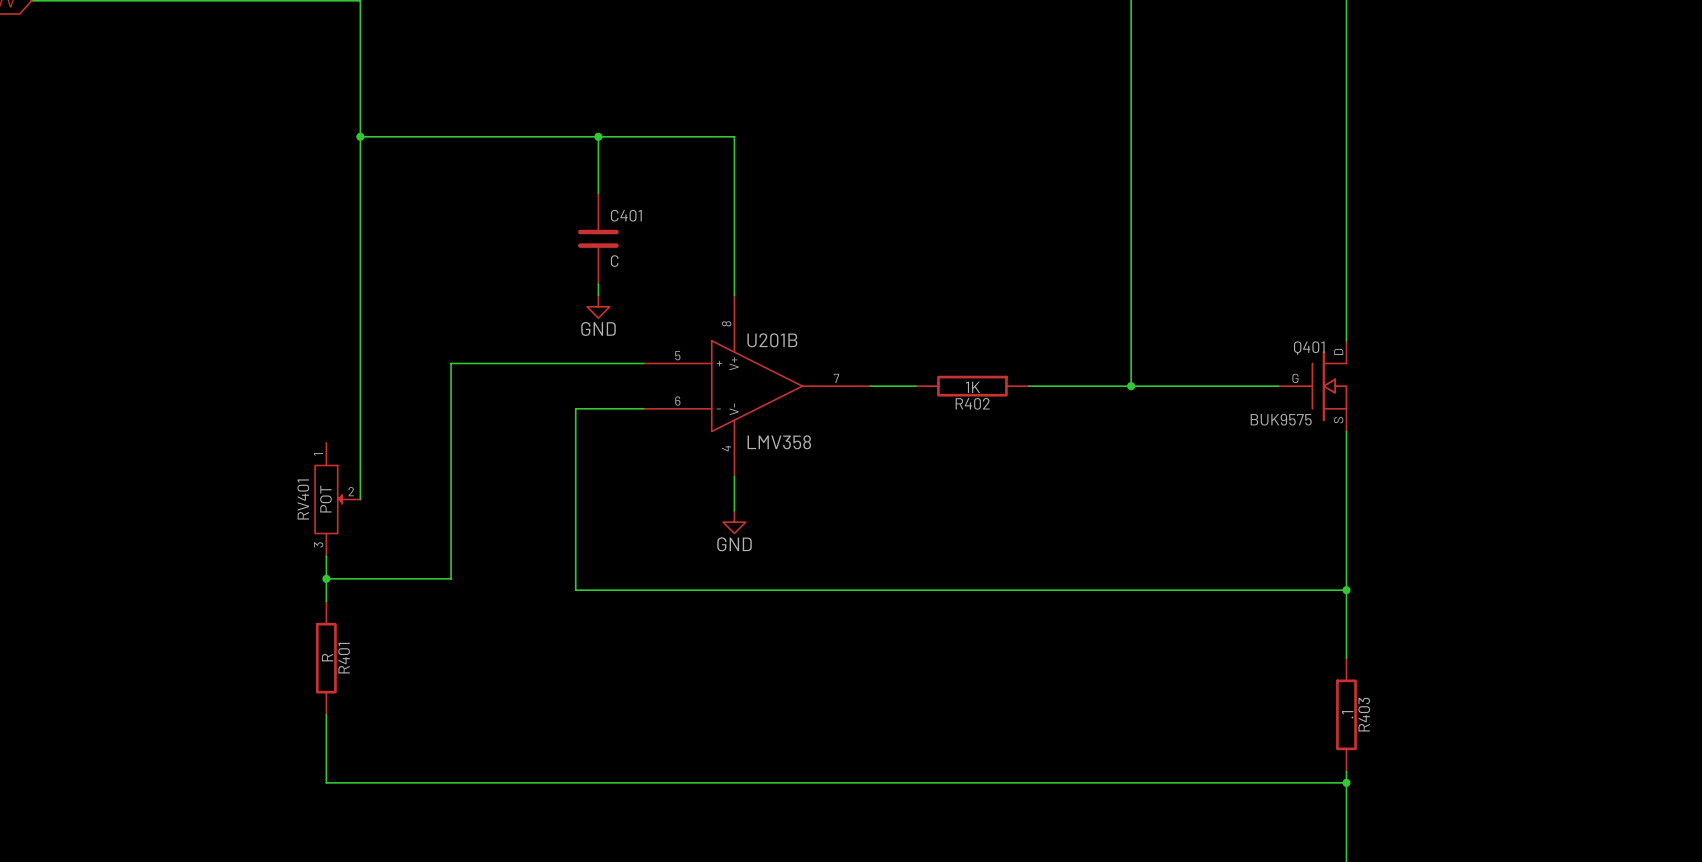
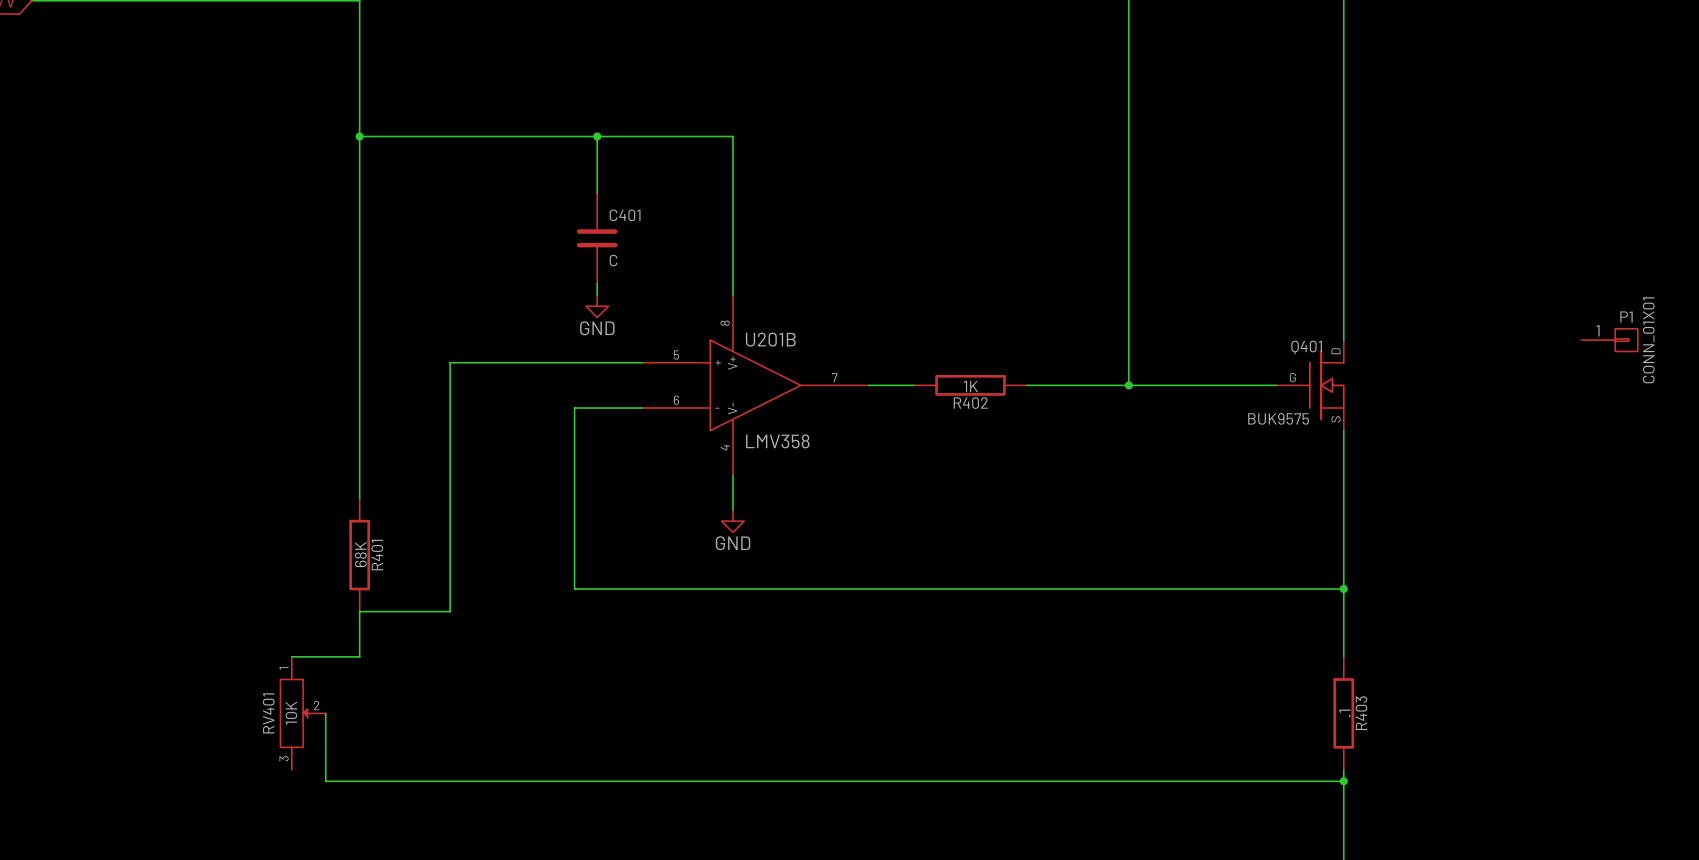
P1: none -> CONN_01X01 (1609, 340)
RV401 value: POT (325, 499) -> 10K (291, 713)
RV401 position: (337, 499) -> (303, 713)
wire: (326, 556) (326, 601) -> none
wire: (326, 578) (451, 578) -> (291, 656) (359, 656) (359, 611) (450, 611) (450, 577)
junction: (326, 578) -> none
R401 value: R (327, 657) -> 68K (360, 554)
R401 position: (326, 658) -> (359, 555)

